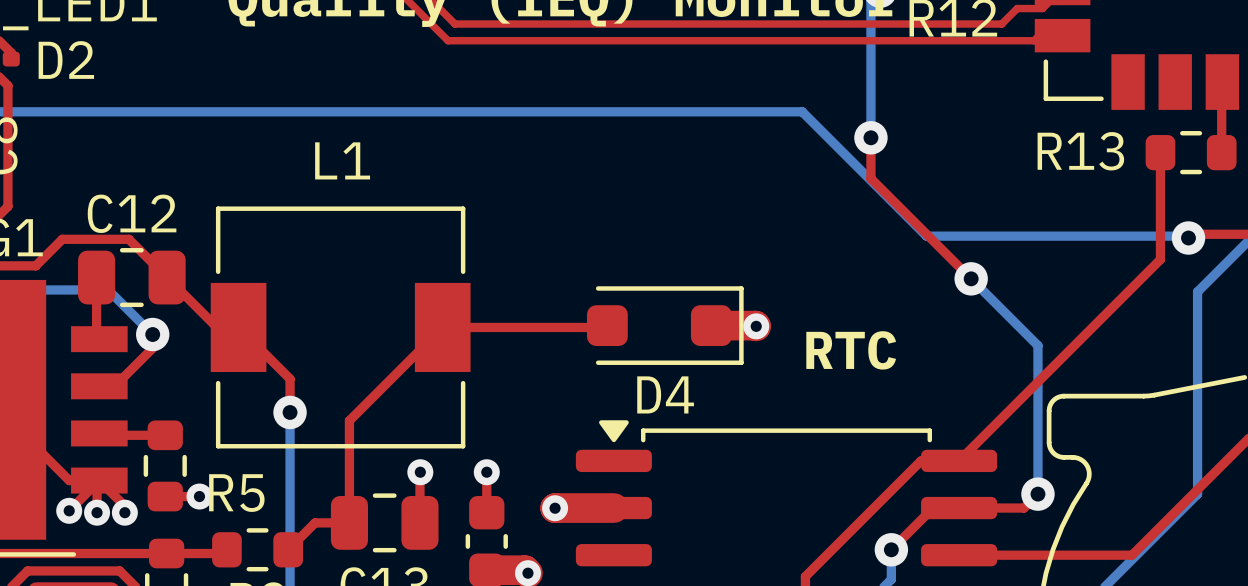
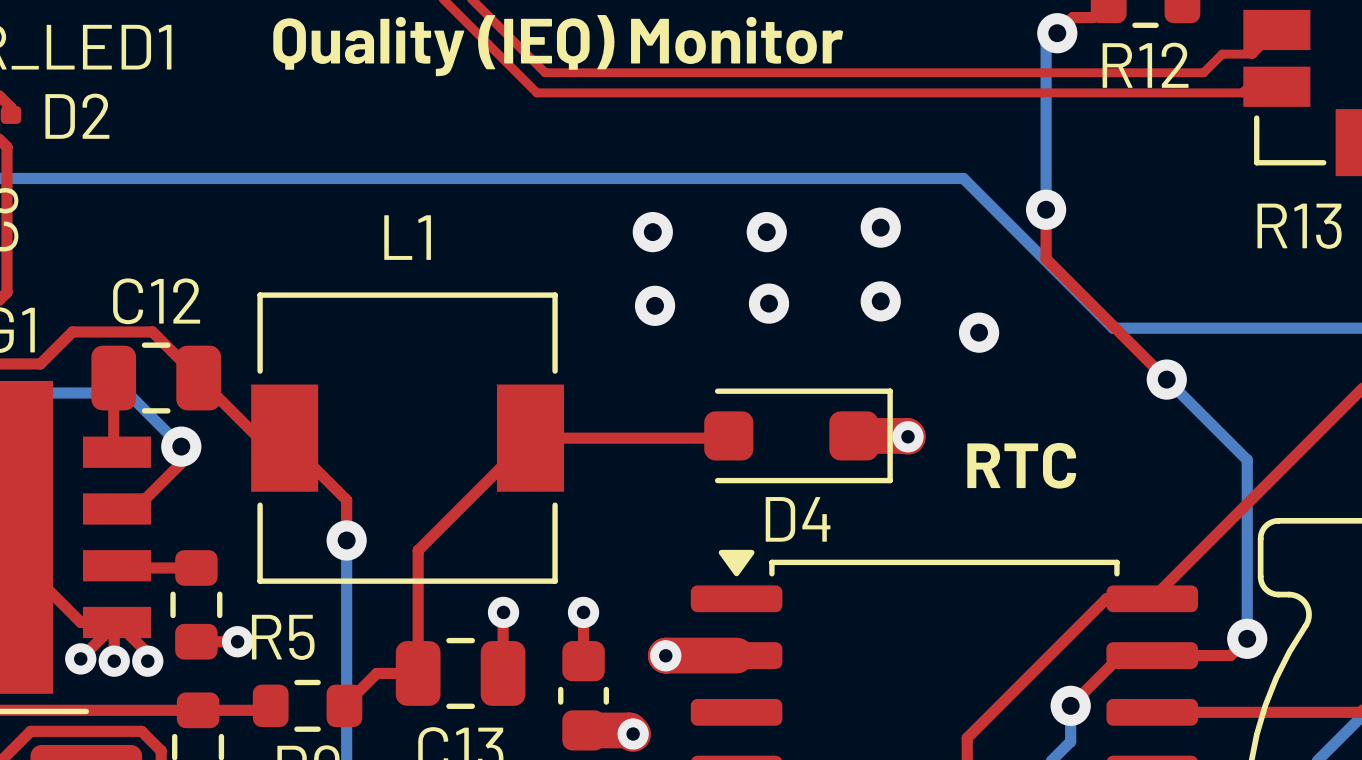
via: none -> (880, 227)
via: none -> (652, 232)
via: none -> (766, 232)
via: none -> (880, 301)
via: none -> (769, 303)
via: none -> (655, 305)
via: none -> (979, 332)

